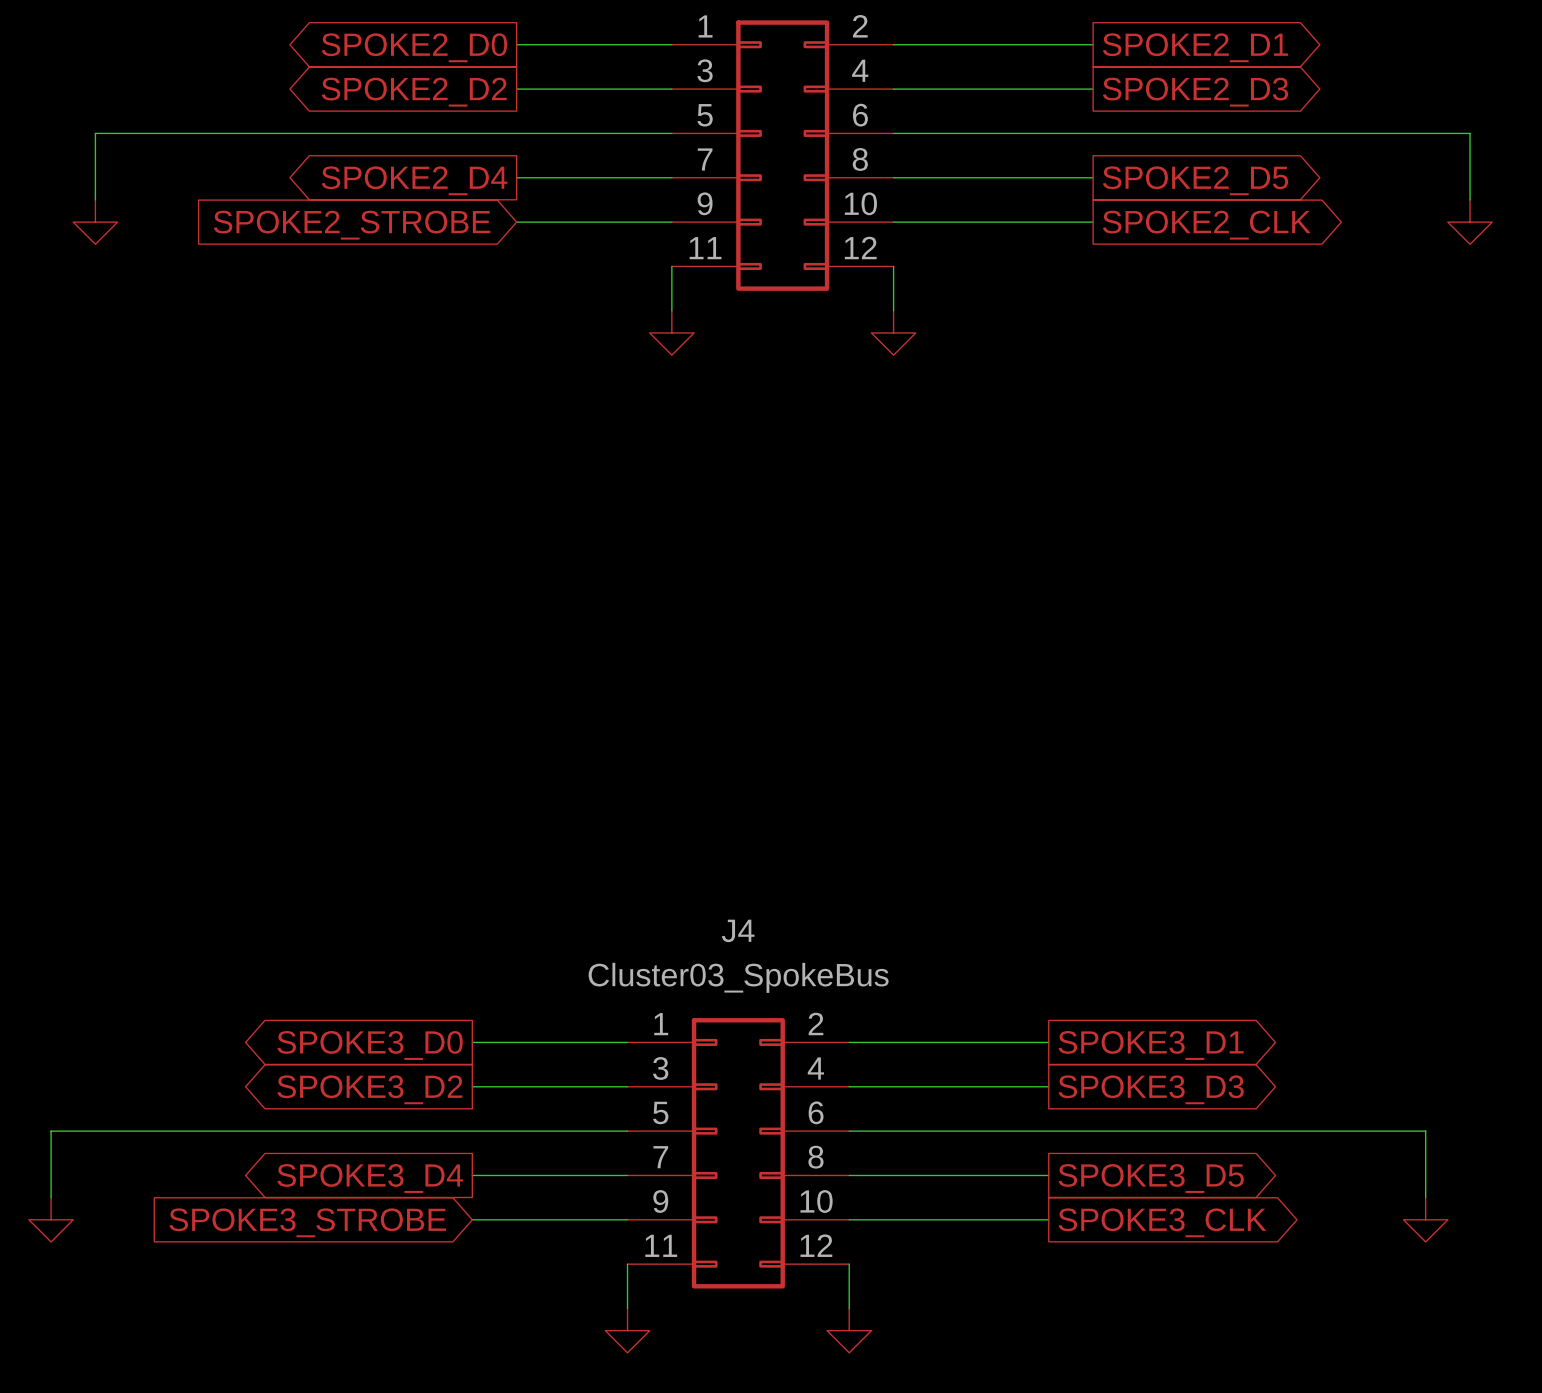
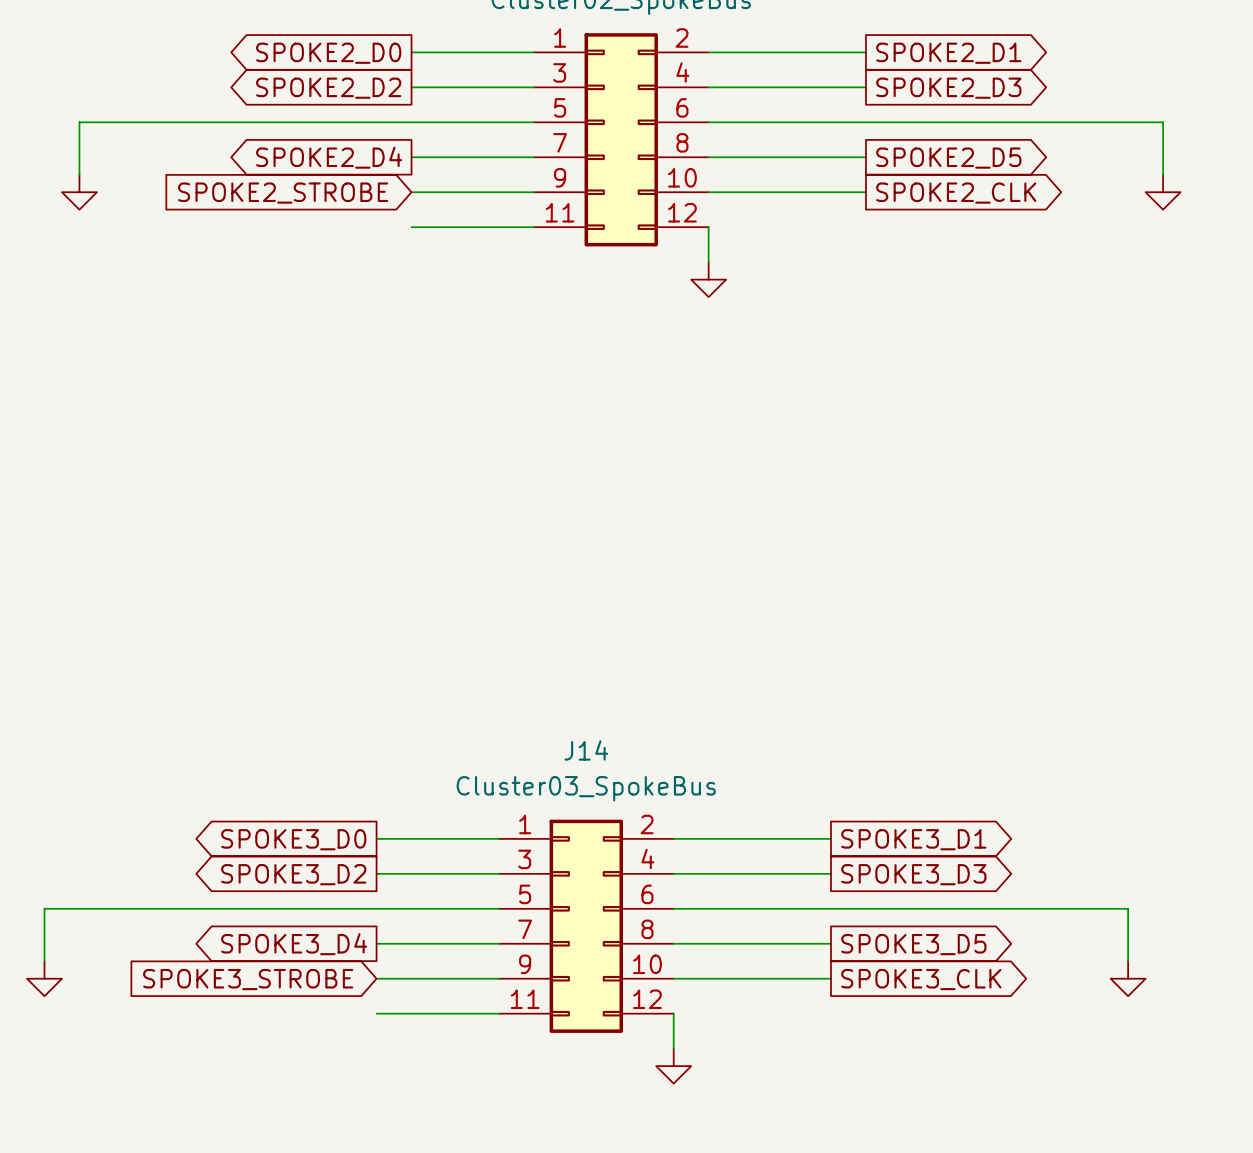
wire: (671, 266) (671, 310) -> (533, 227) (411, 227)
power symbol: (671, 332) -> none
J4 name: J4 (738, 930) -> J14 (586, 750)
wire: (627, 1264) (627, 1308) -> (498, 1013) (376, 1013)
power symbol: (627, 1330) -> none

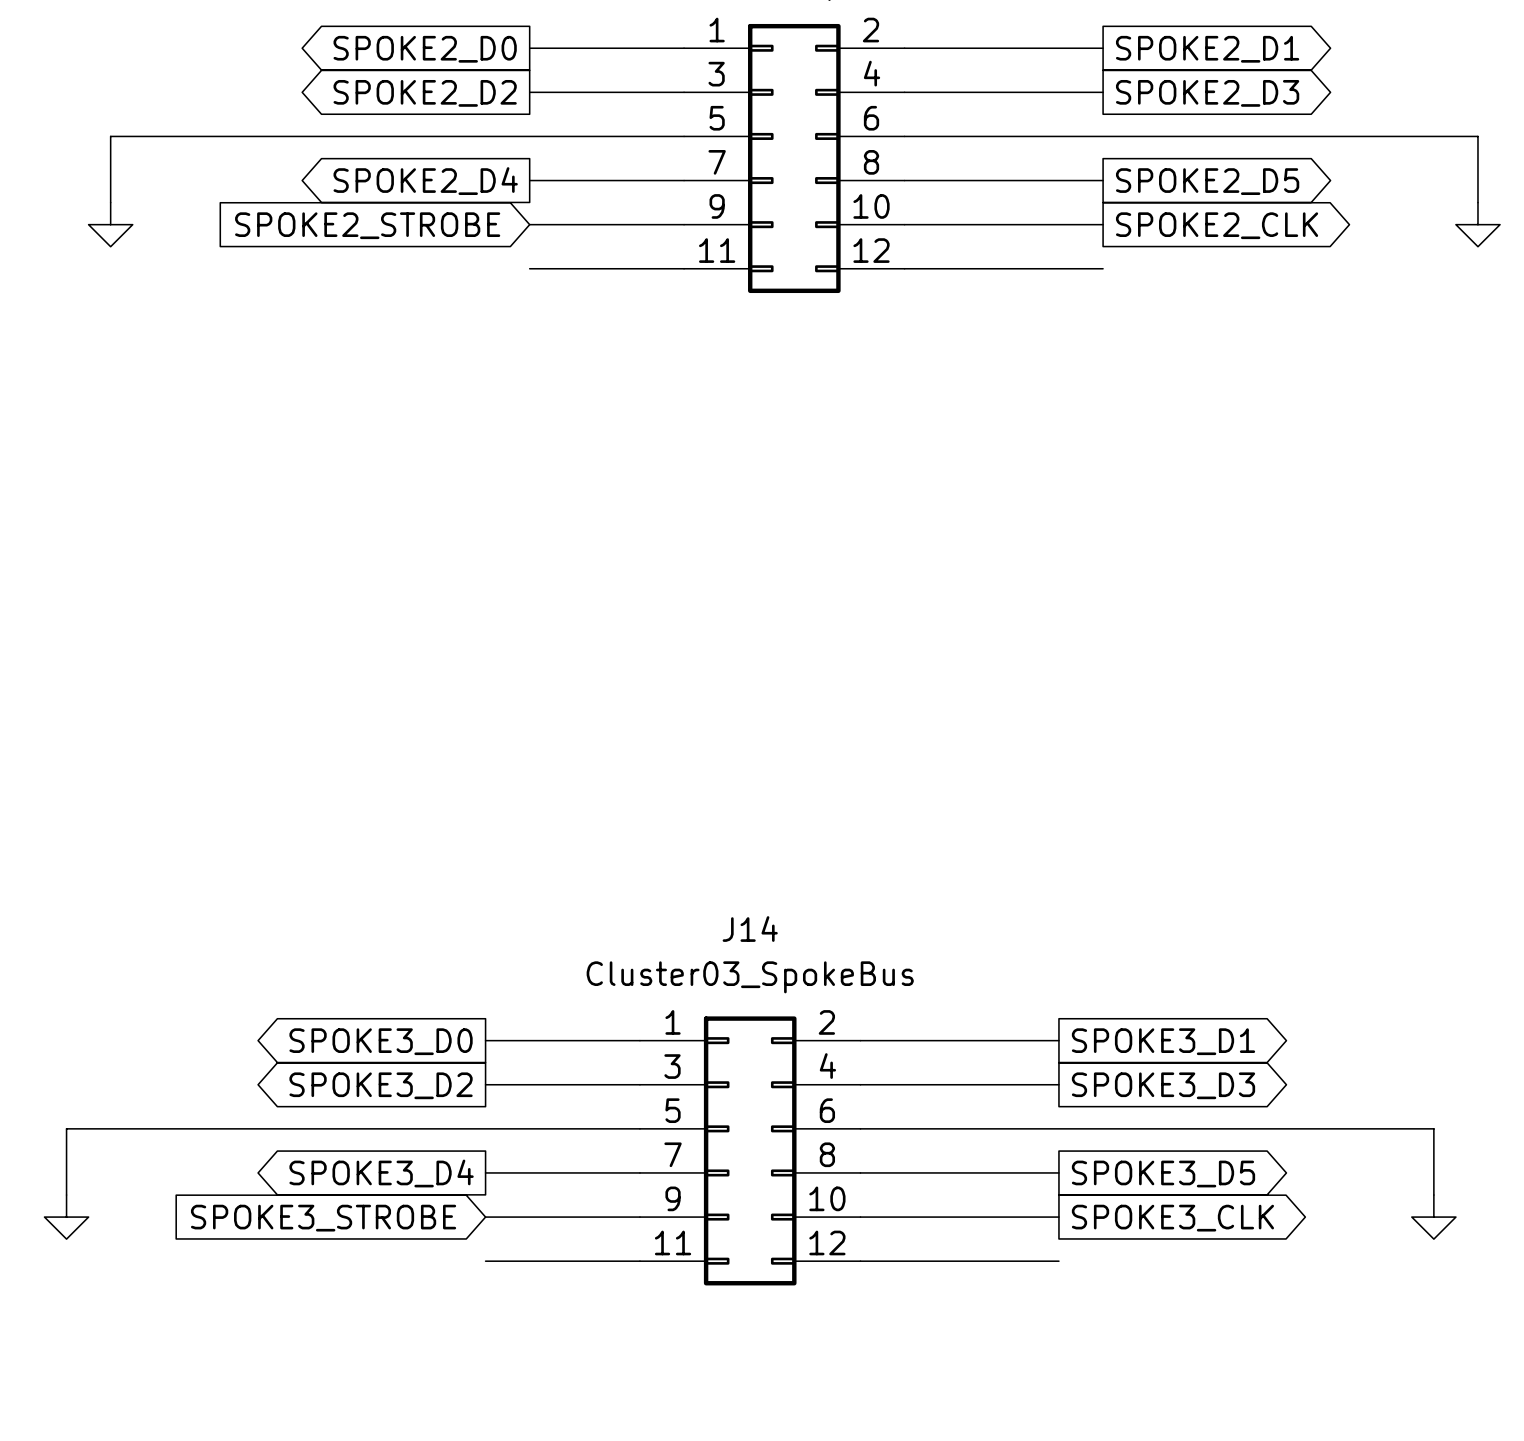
wire: (708, 227) (708, 262) -> (904, 268) (1103, 268)
power symbol: (708, 279) -> none
wire: (673, 1013) (673, 1048) -> (860, 1261) (1058, 1261)
power symbol: (673, 1066) -> none

